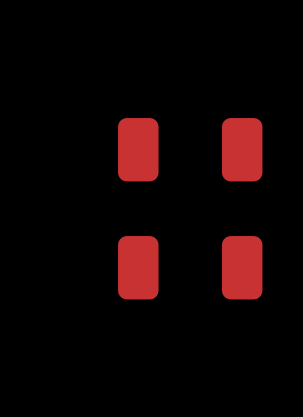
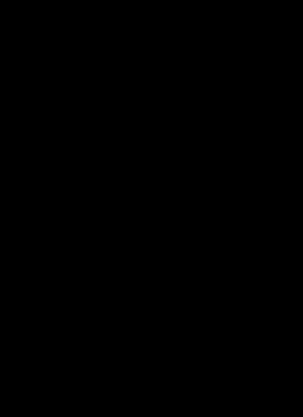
part: (190, 149) -> none
part: (190, 267) -> none

